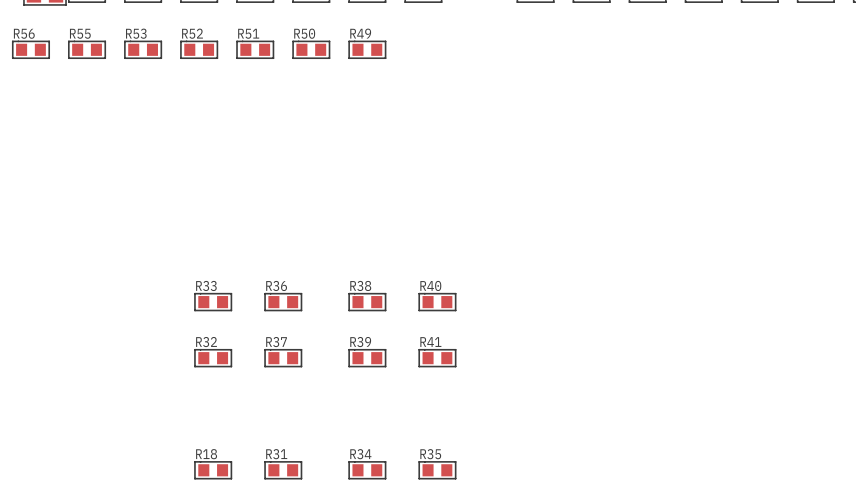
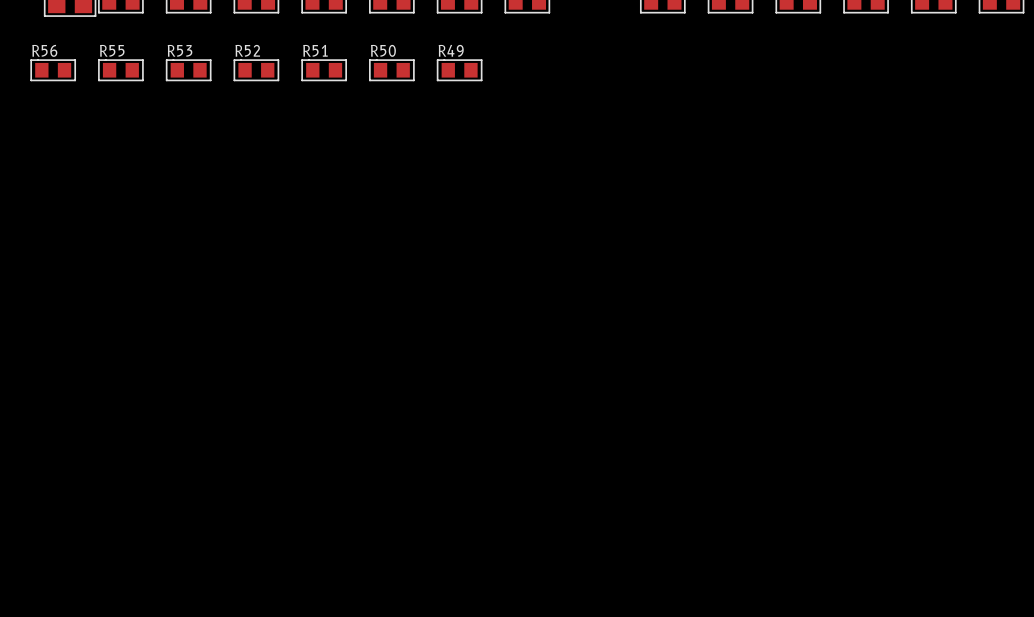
R33: (213, 302) -> none
R36: (283, 302) -> none
R38: (367, 302) -> none
R40: (437, 302) -> none
R32: (213, 358) -> none
R37: (283, 358) -> none
R39: (367, 358) -> none
R41: (437, 358) -> none
R18: (213, 470) -> none
R31: (283, 470) -> none
R34: (367, 470) -> none
R35: (437, 470) -> none

